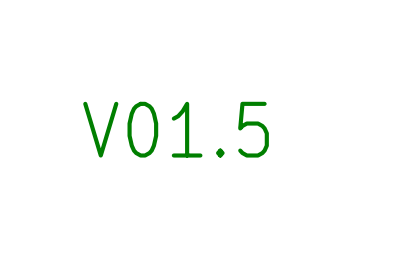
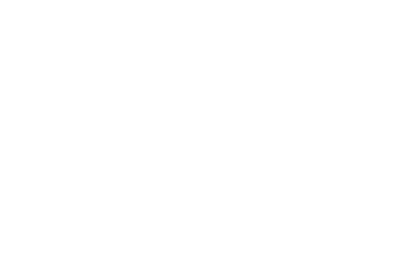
text: V01.5 (176, 129) -> none

